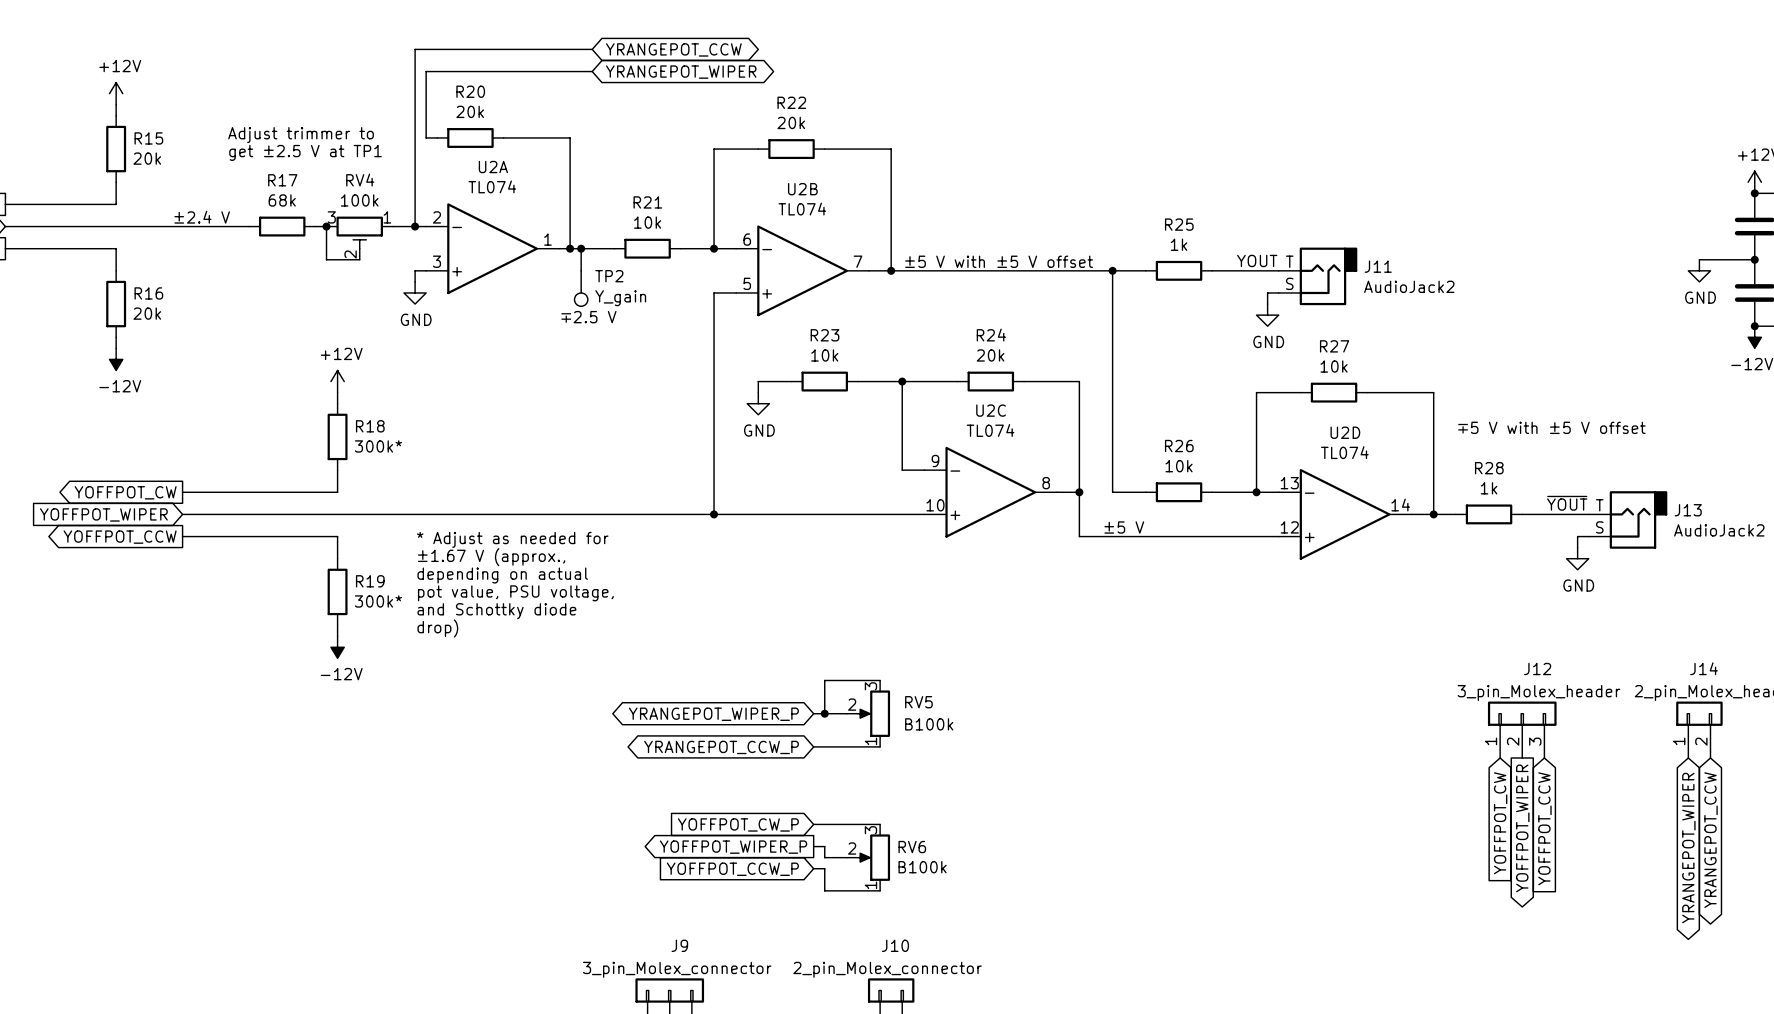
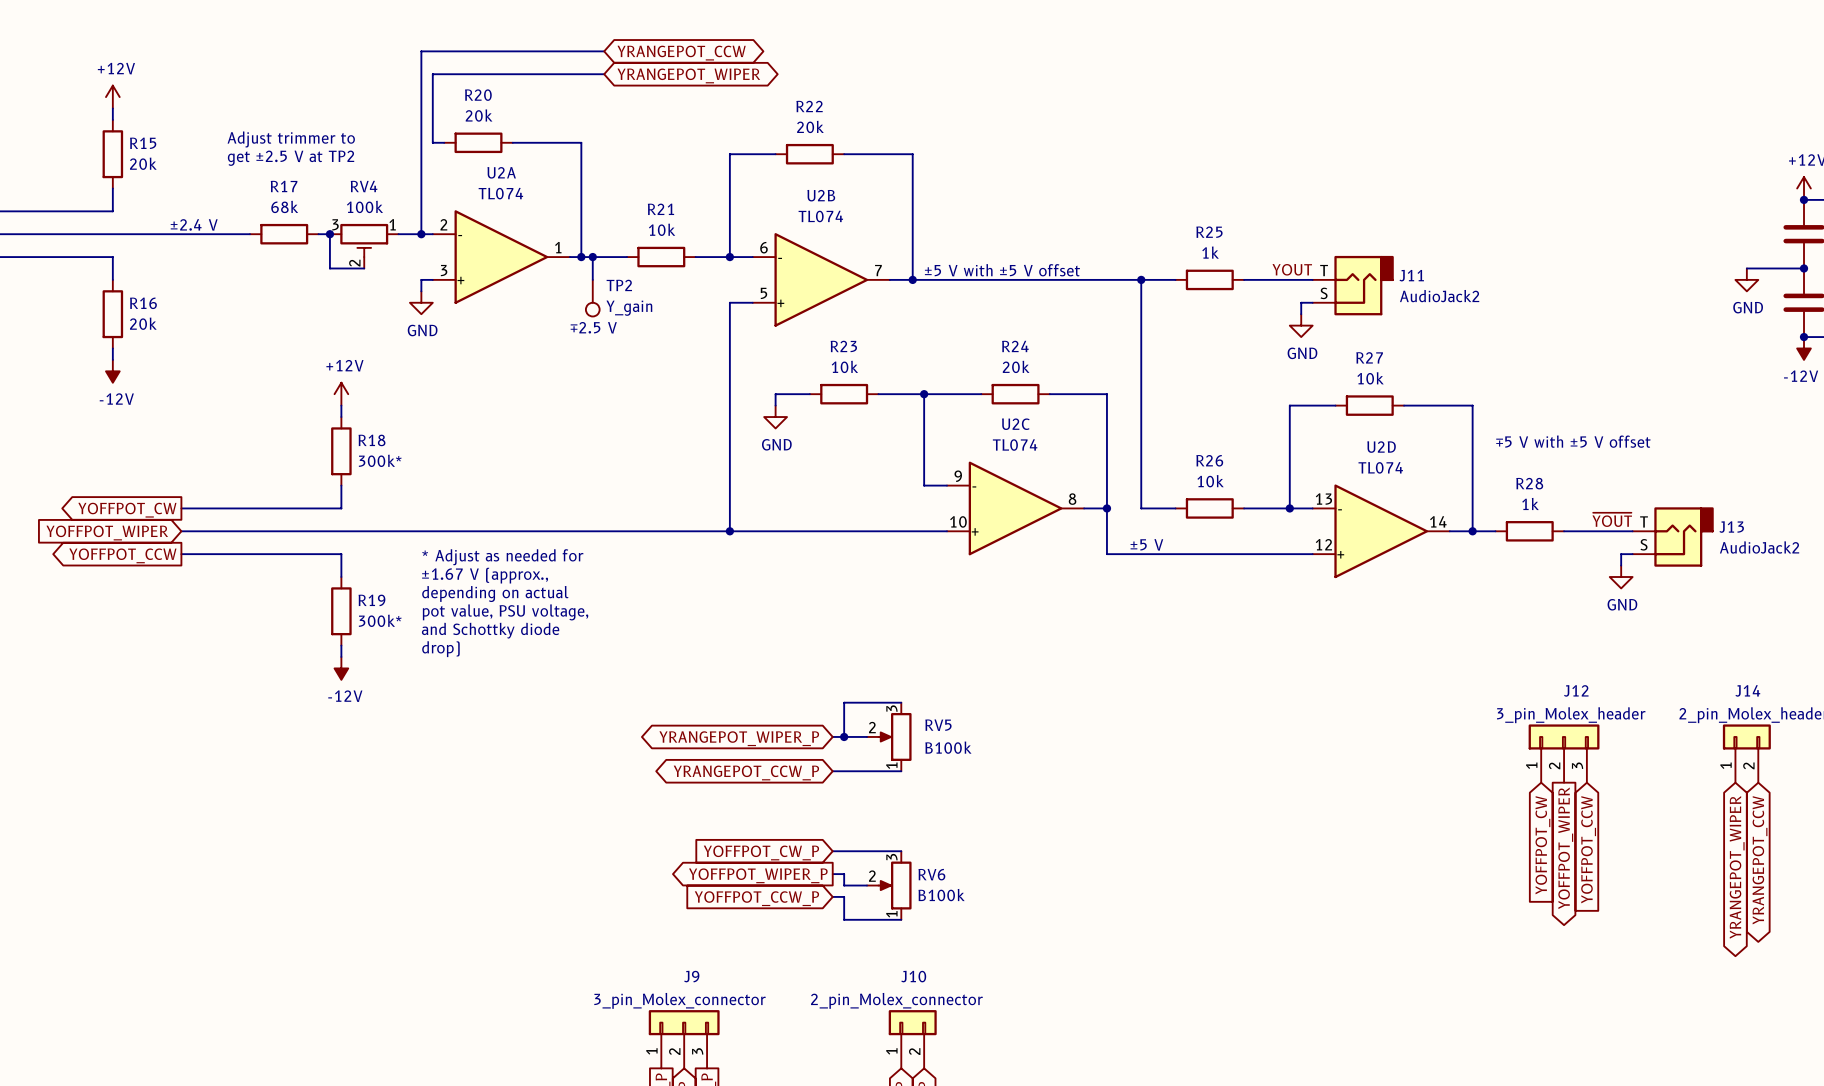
text: get ±2.5 V at TP1 (305, 152) -> get ±2.5 V at TP2 (291, 158)

